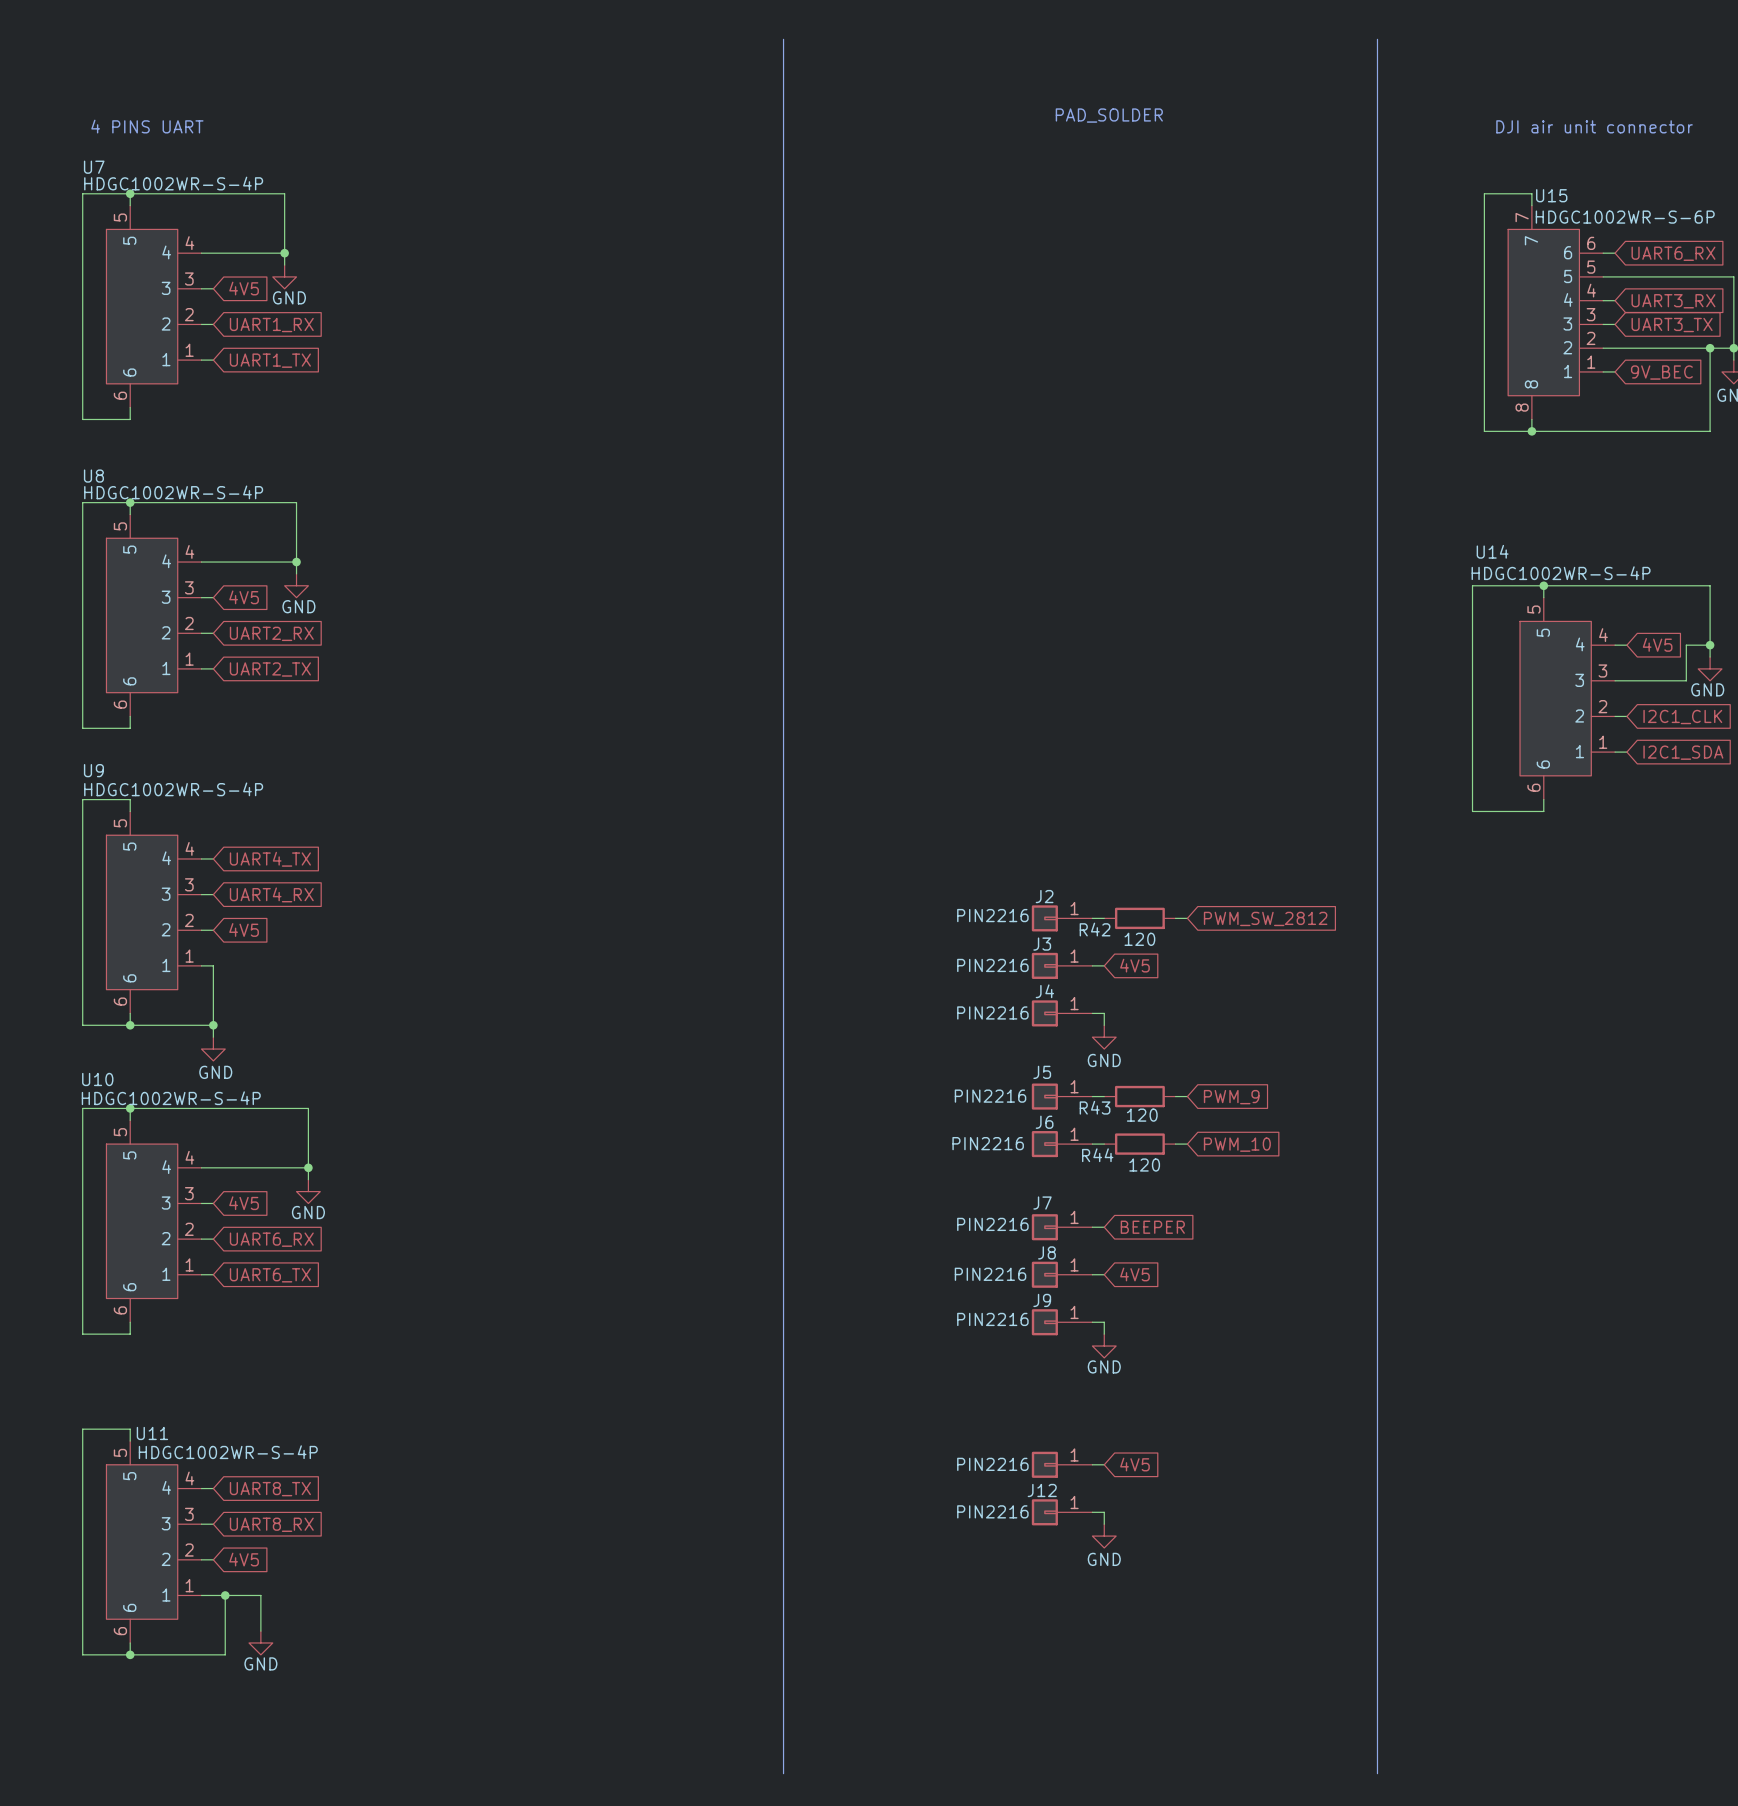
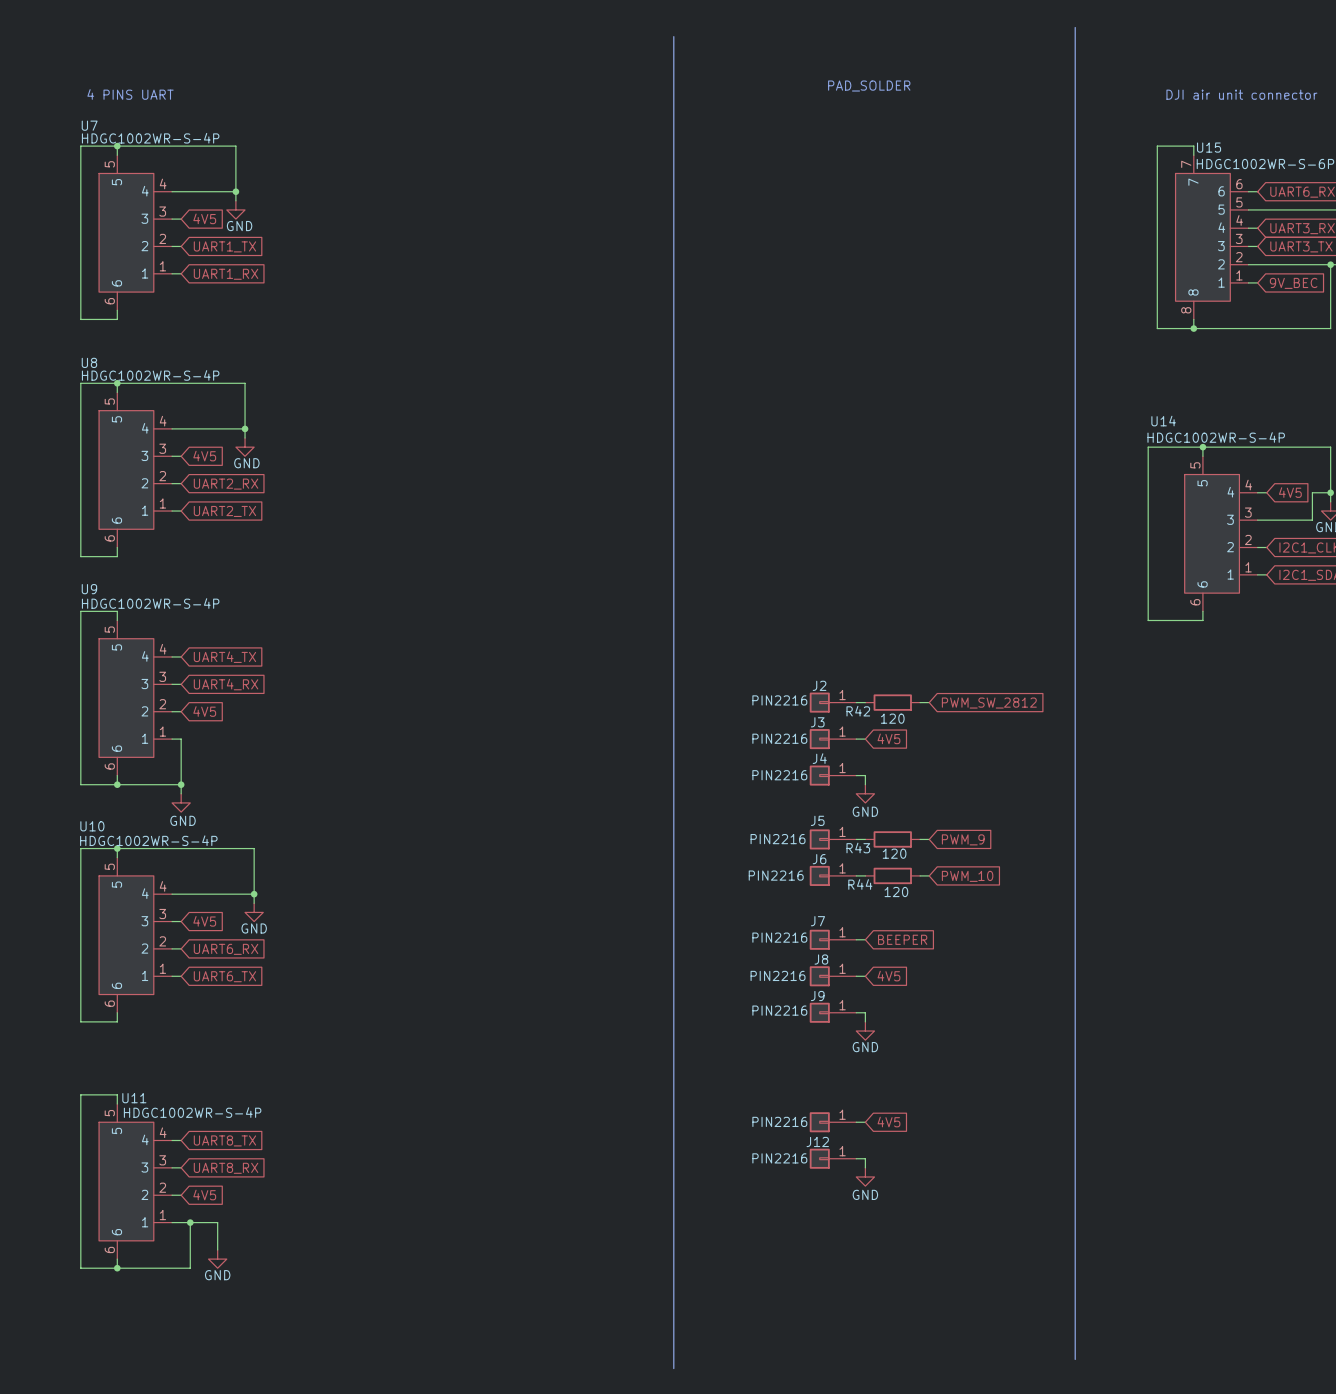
line: (783, 39) (783, 1773) -> (673, 36) (673, 1368)
global label: UART1_RX (271, 325) -> UART1_TX (224, 246)
global label: UART1_TX (270, 360) -> UART1_RX (226, 274)

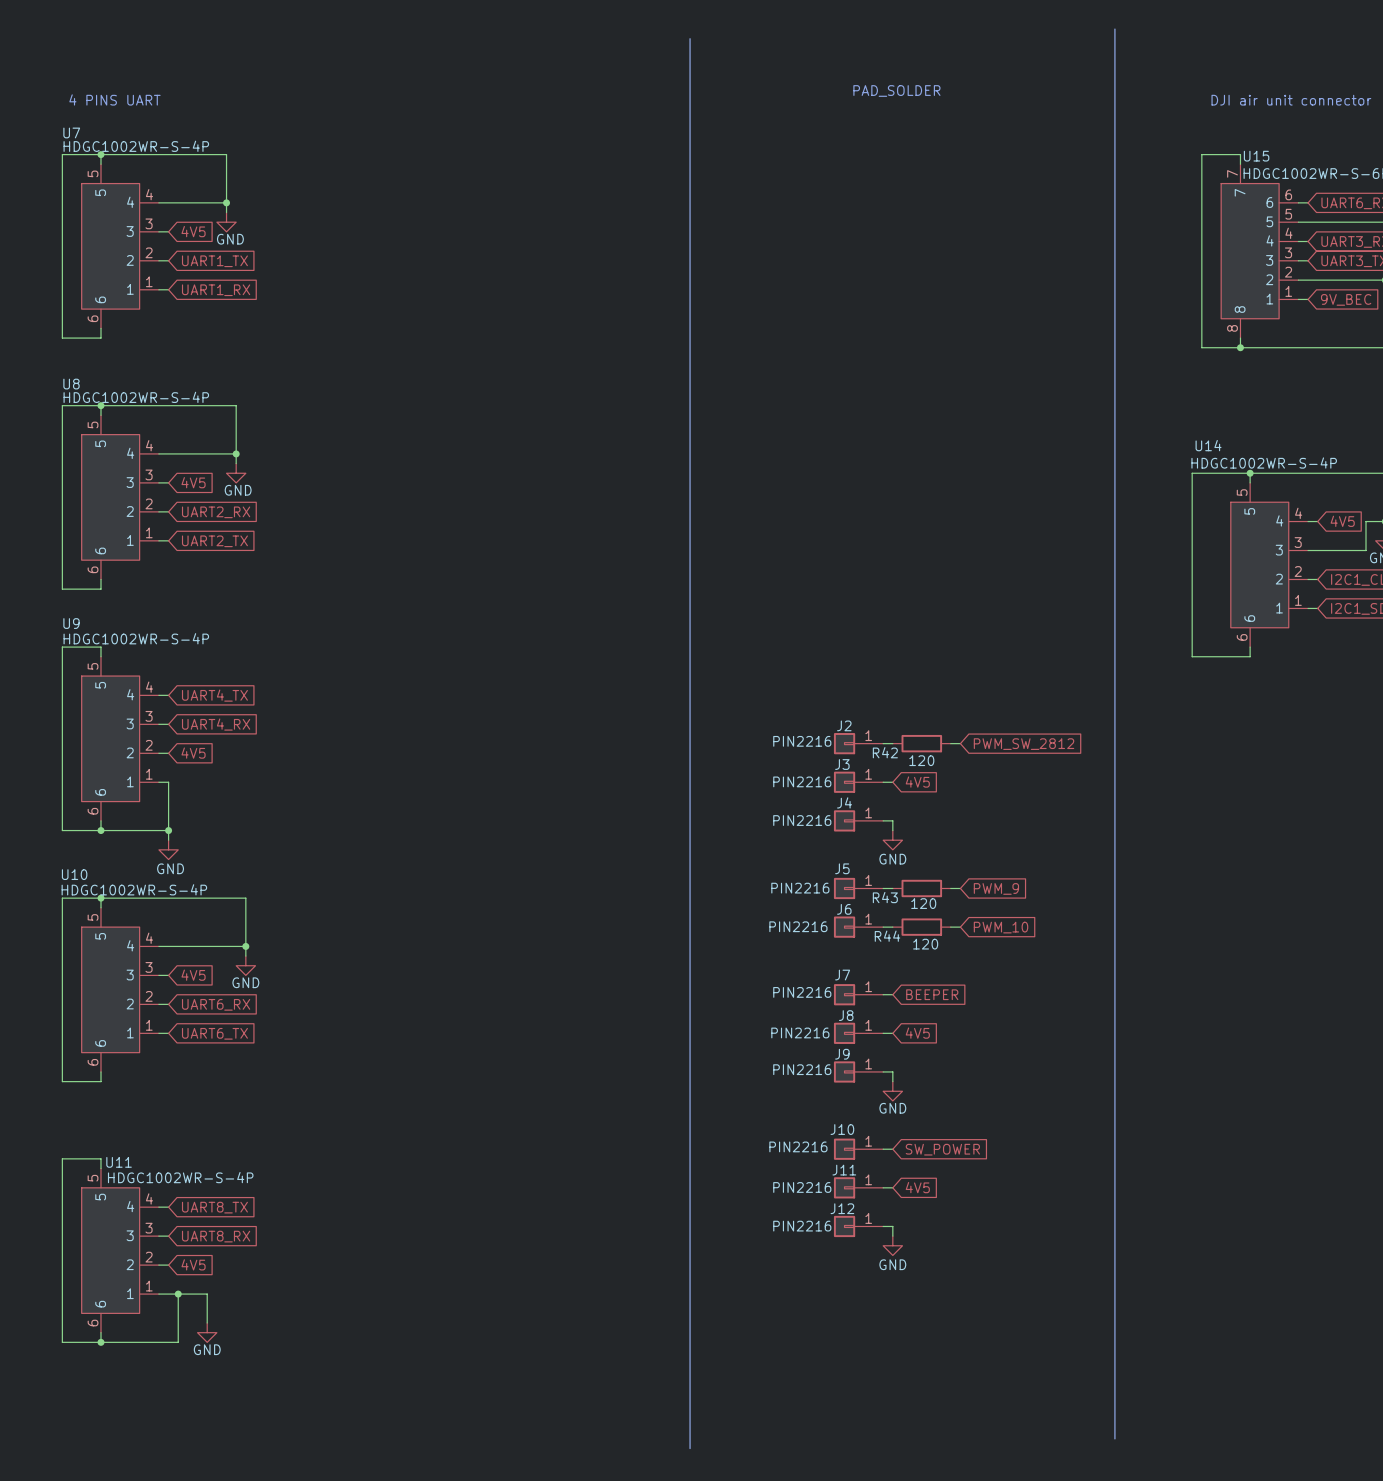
J10: none -> PIN2216 (858, 1149)
wire: none -> (883, 1149) (892, 1149)
global label: none -> SW_POWER (942, 1149)
J11 name: none -> J11 (844, 1170)

